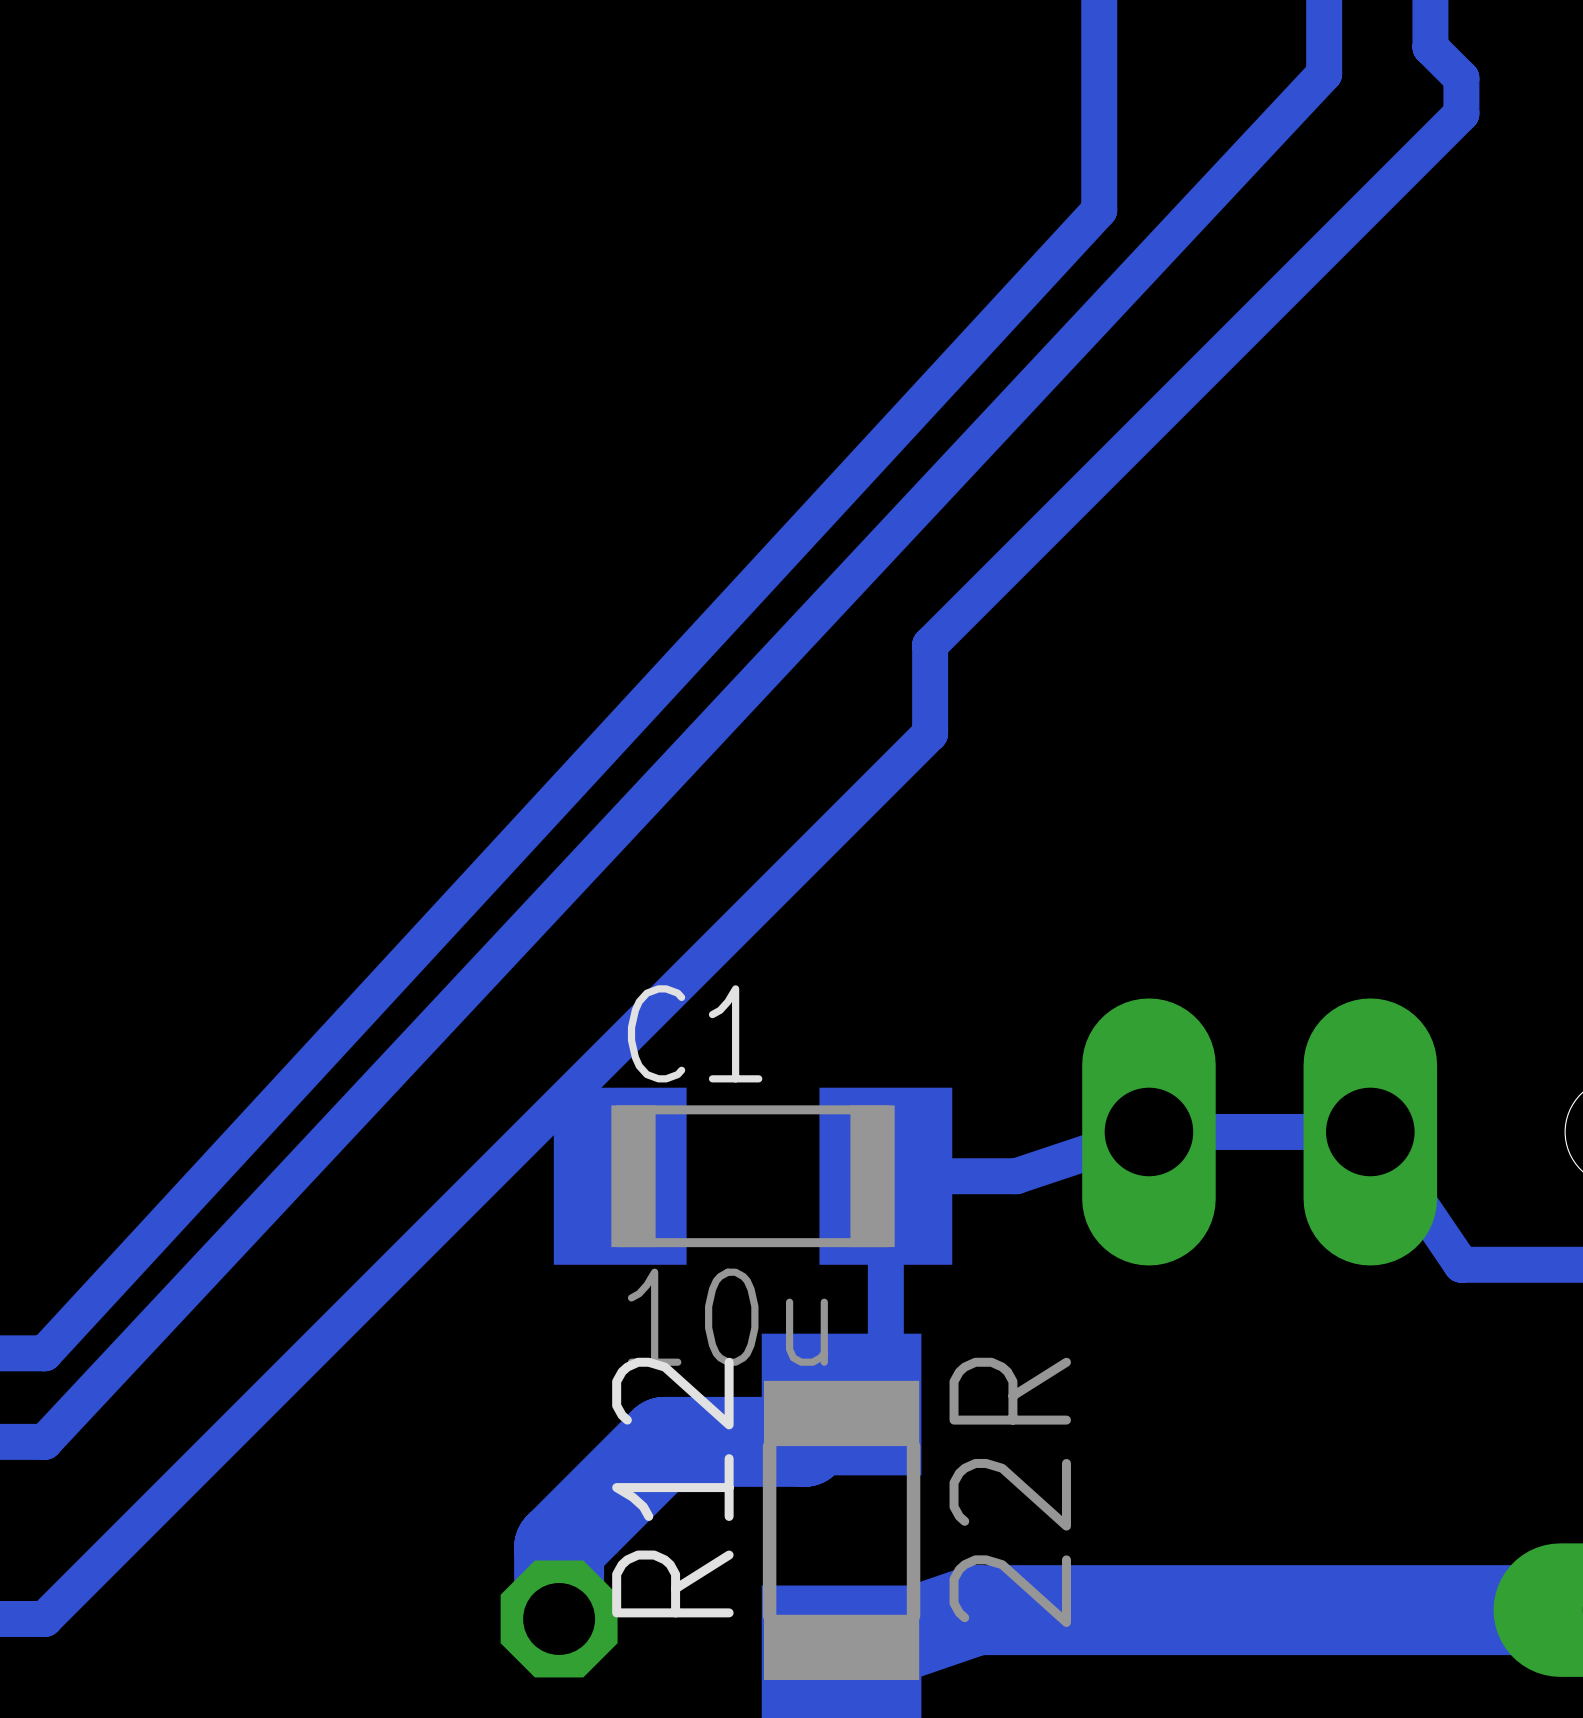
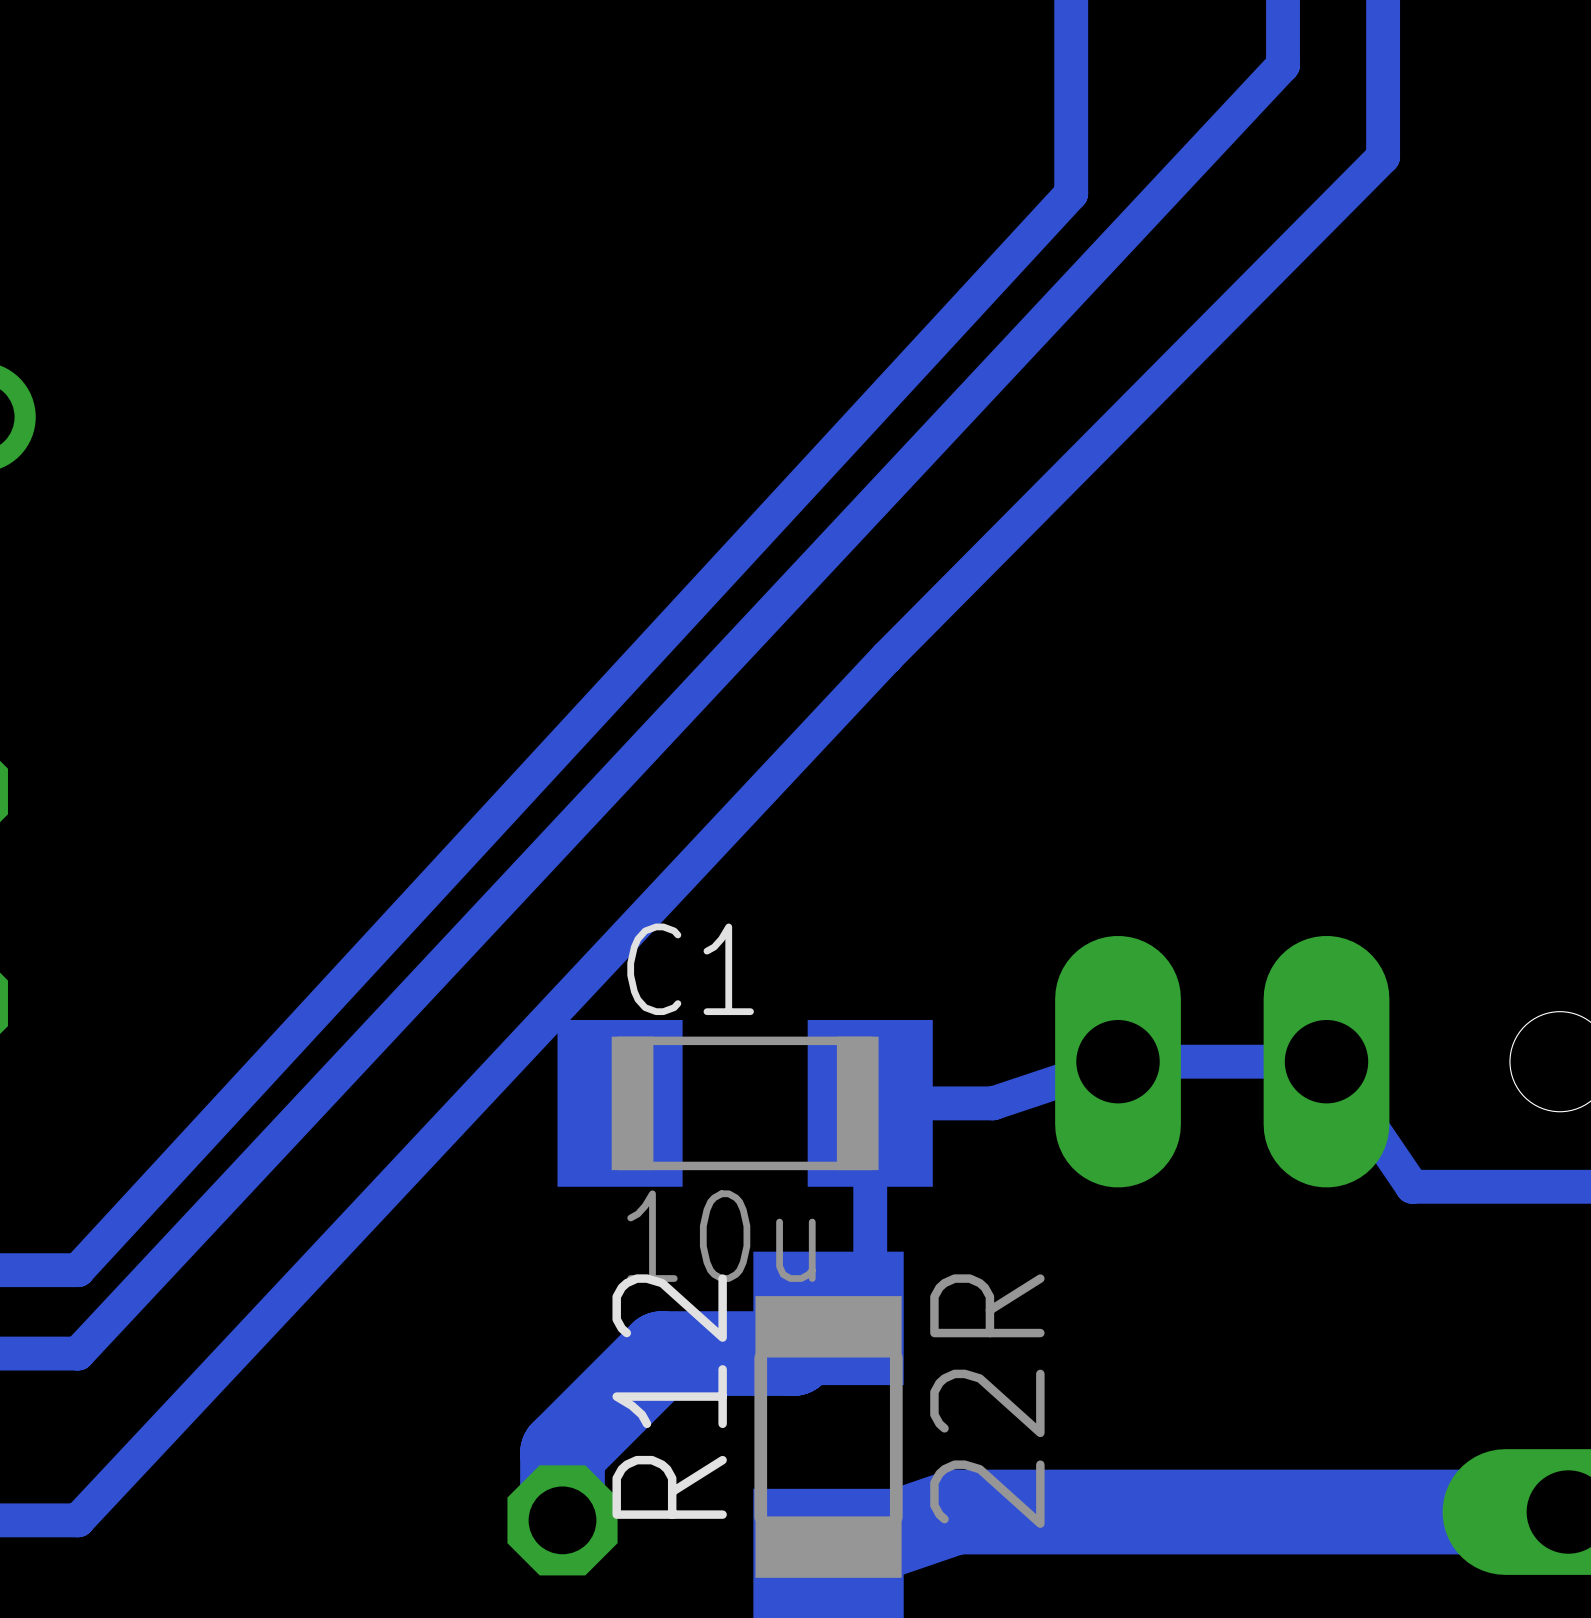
bottom track: (1430, 47) (1461, 78) (1461, 113) (930, 644) (930, 733) (44, 1618) -> (1383, 40) (1383, 156) (886, 657) (77, 1520)

